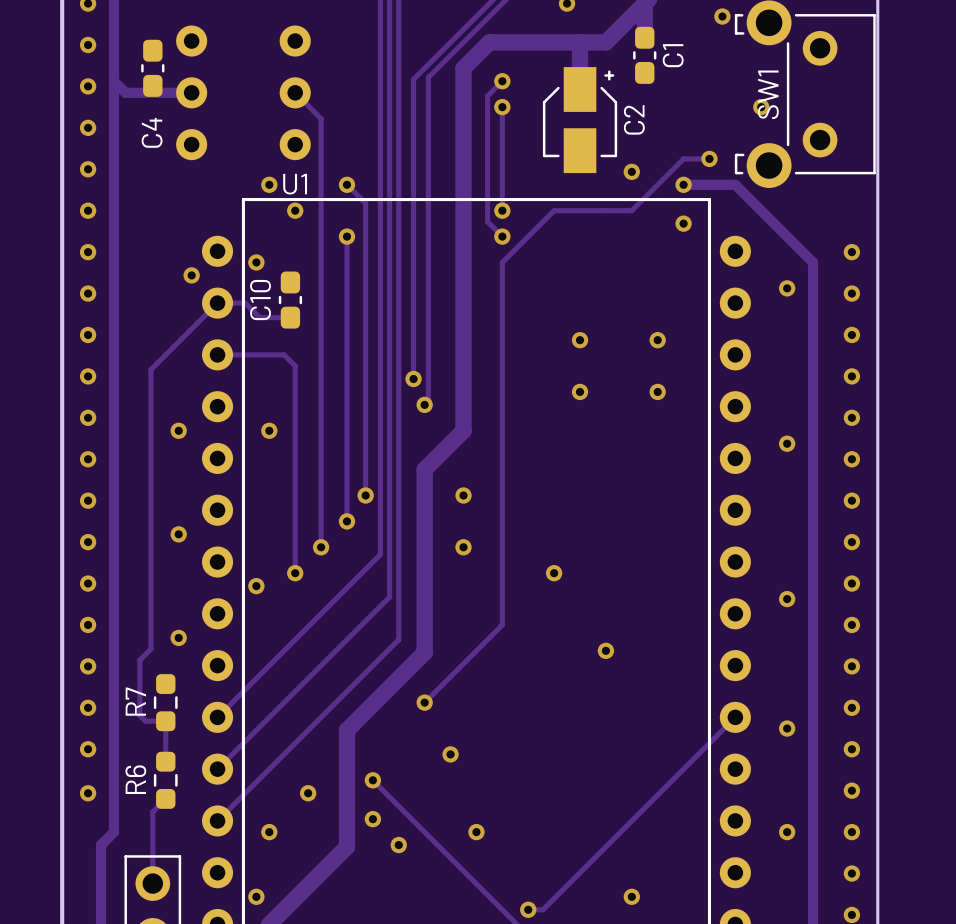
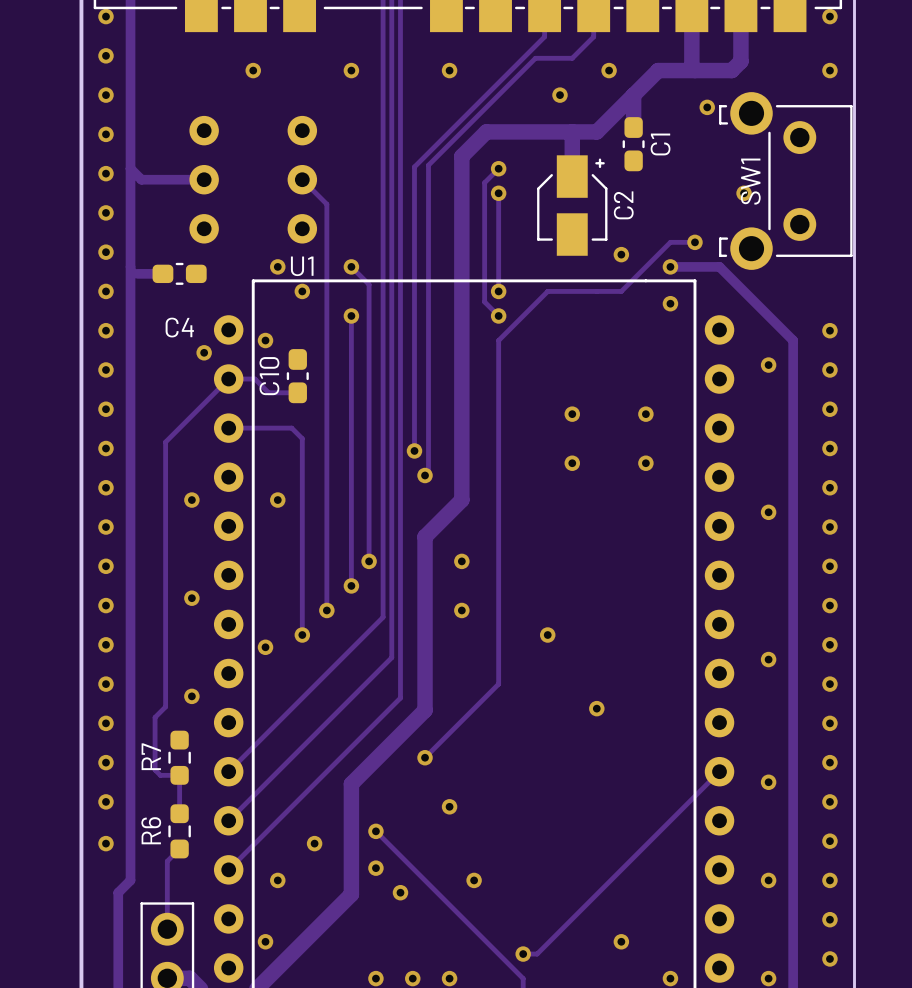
C4 rotation: 0° (152, 68) -> 90° clockwise (179, 273)
C4 position: (152, 68) -> (179, 273)
track: none -> (130, 266) (137, 273) (162, 273)

